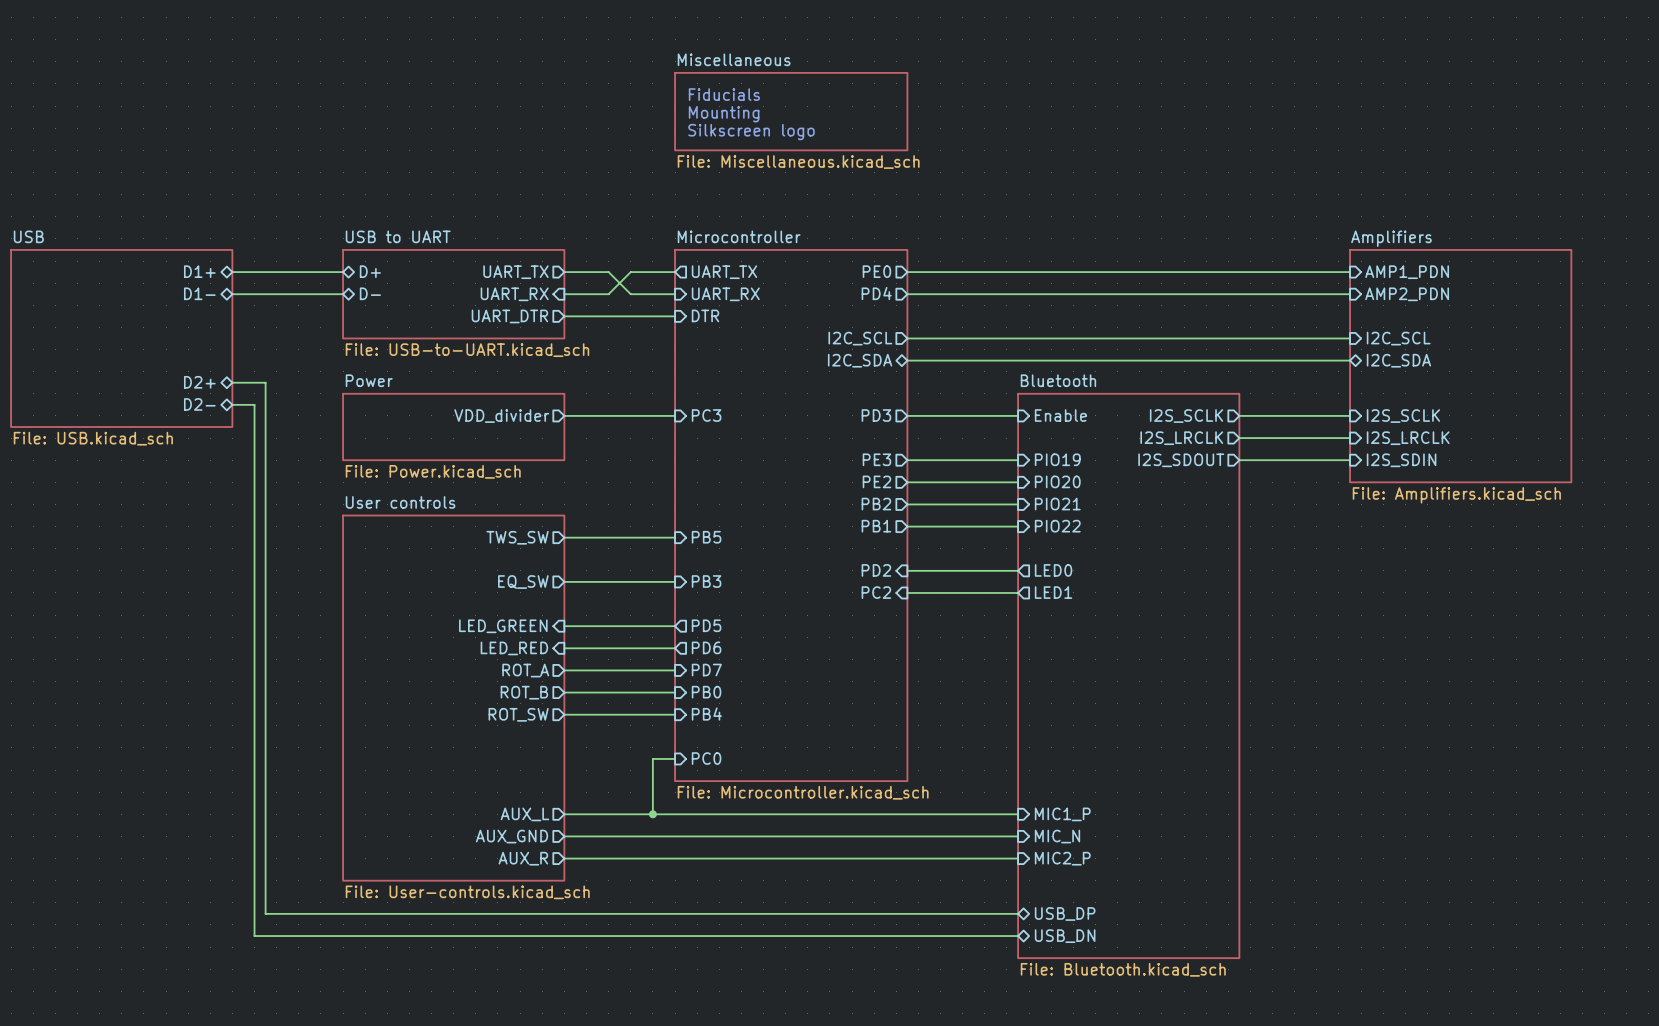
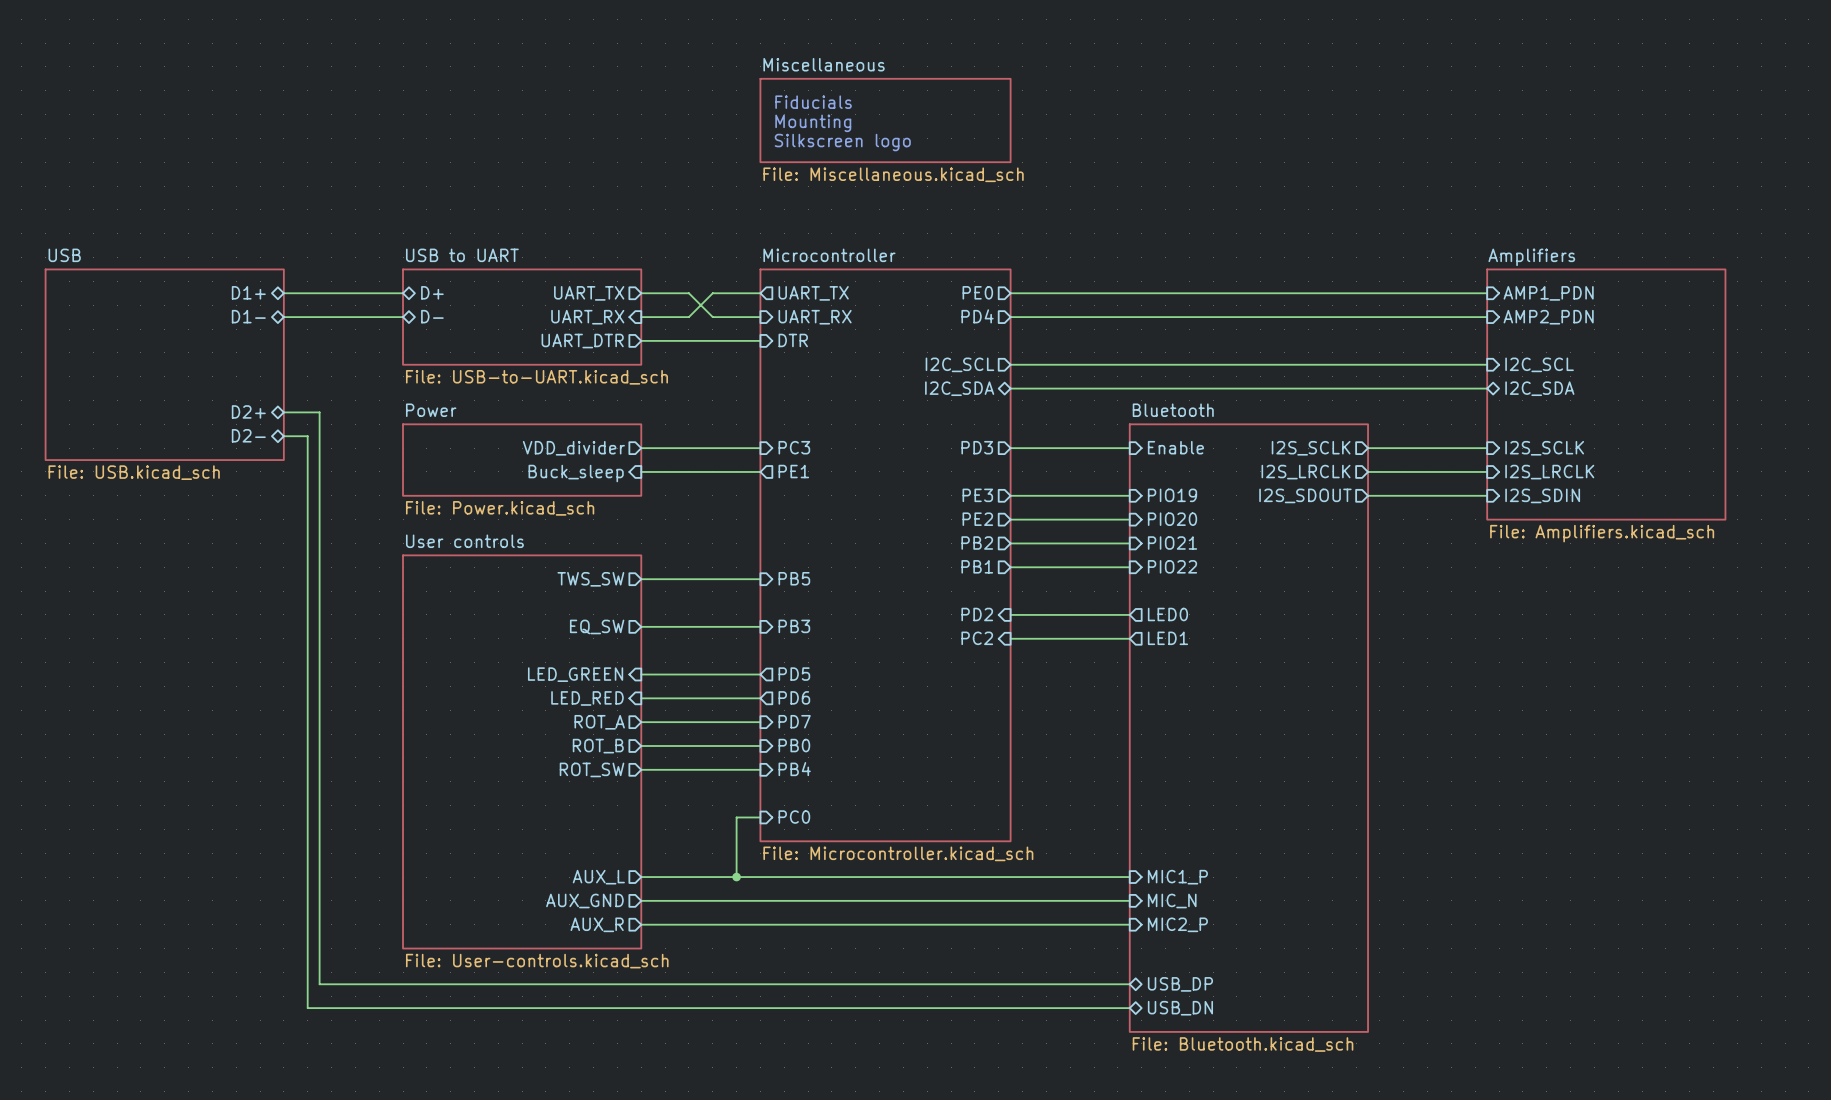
sheet pin: none -> PE1 (793, 471)
wire: none -> (641, 471) (760, 471)
sheet pin: none -> Buck_sleep (576, 473)

